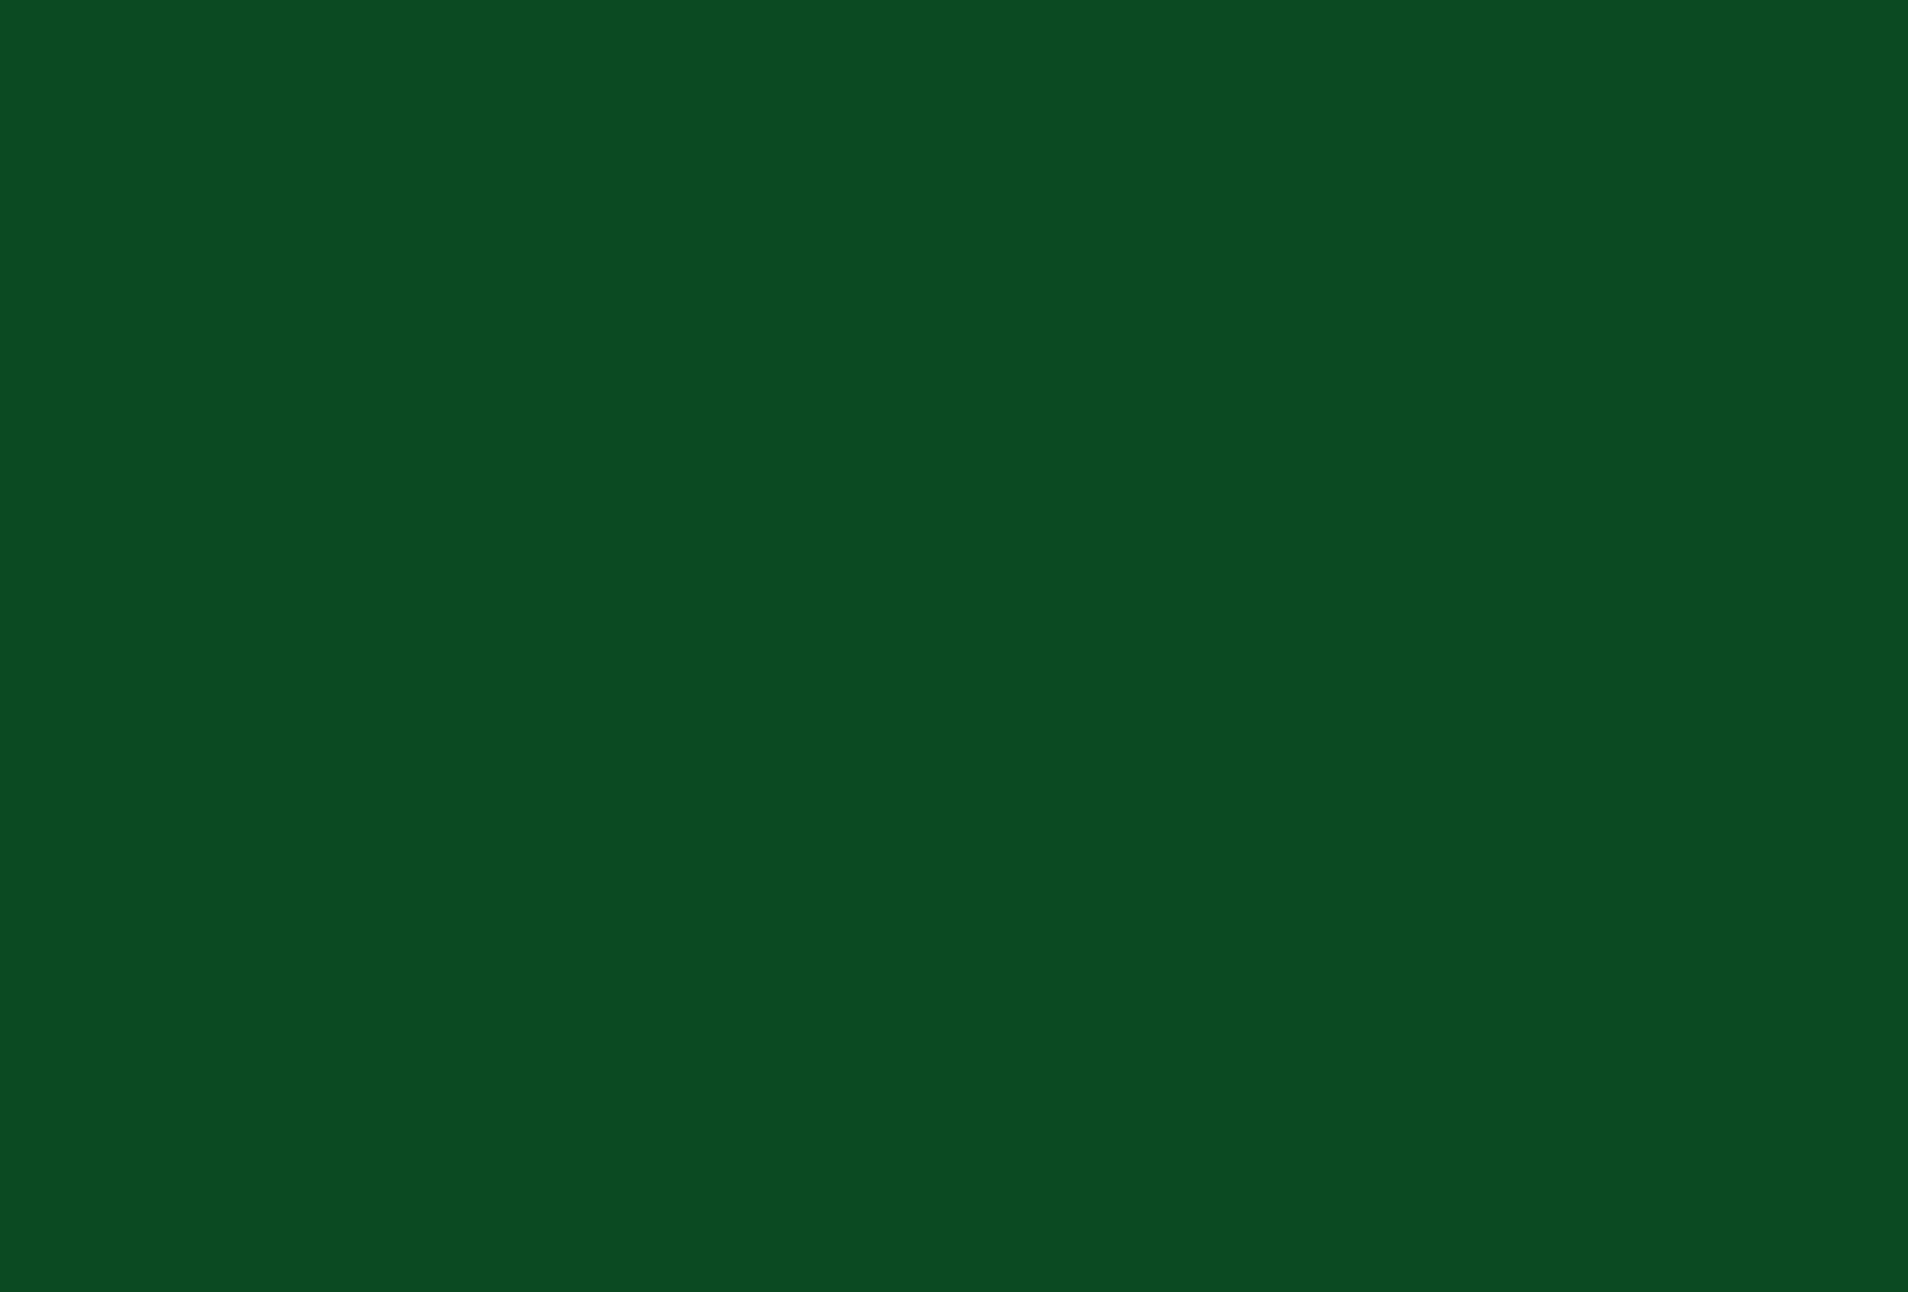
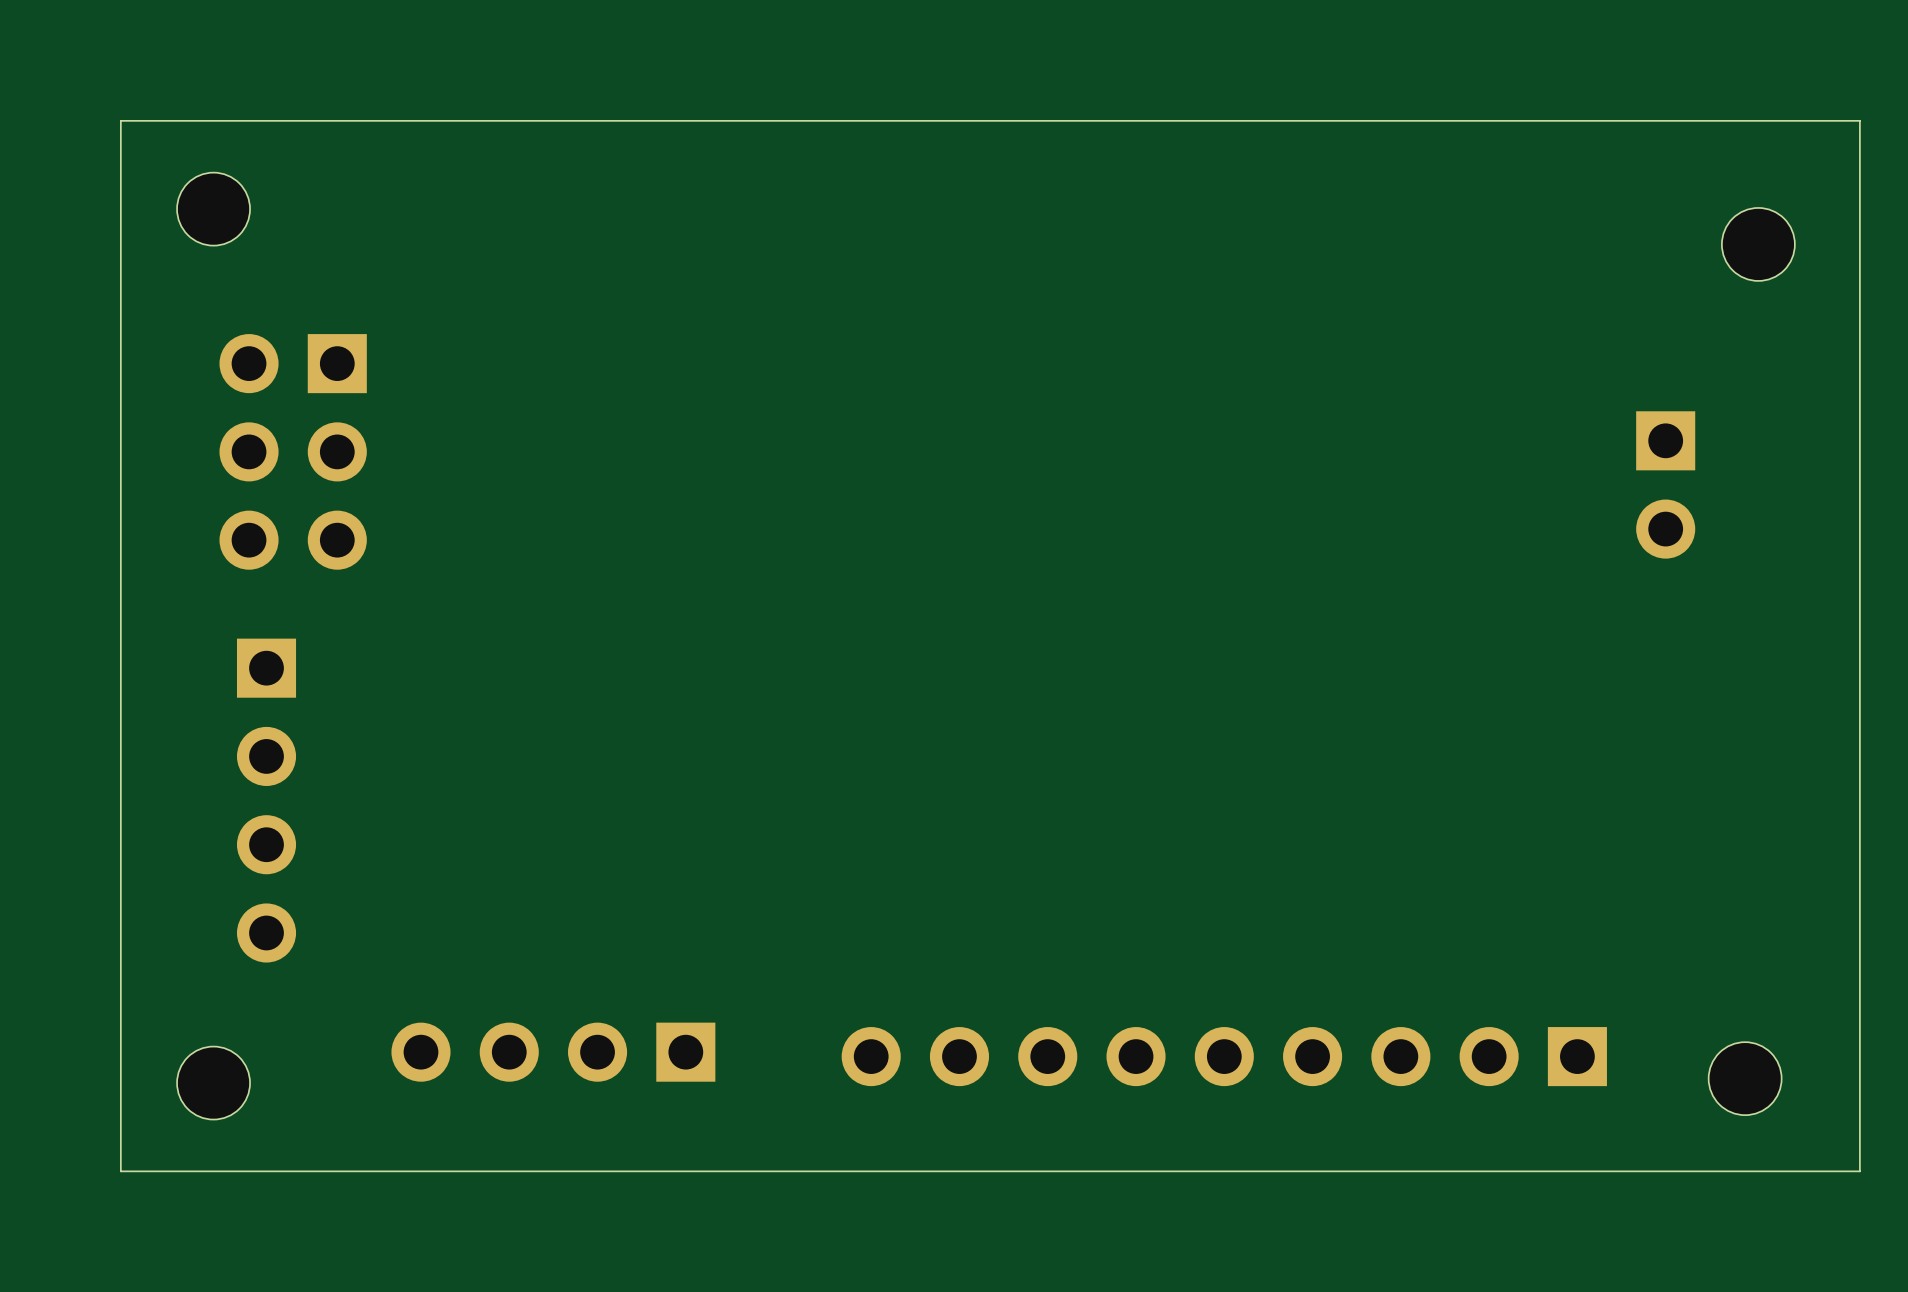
board edge: none -> (1859, 120) (120, 120) (120, 1171) (1859, 1171) (1859, 120)
part: none -> (213, 209)
part: none -> (1758, 244)
part: none -> (293, 451)
part: none -> (1665, 484)
part: none -> (266, 800)
part: none -> (553, 1052)
part: none -> (1224, 1056)
part: none -> (1745, 1078)
part: none -> (213, 1083)

